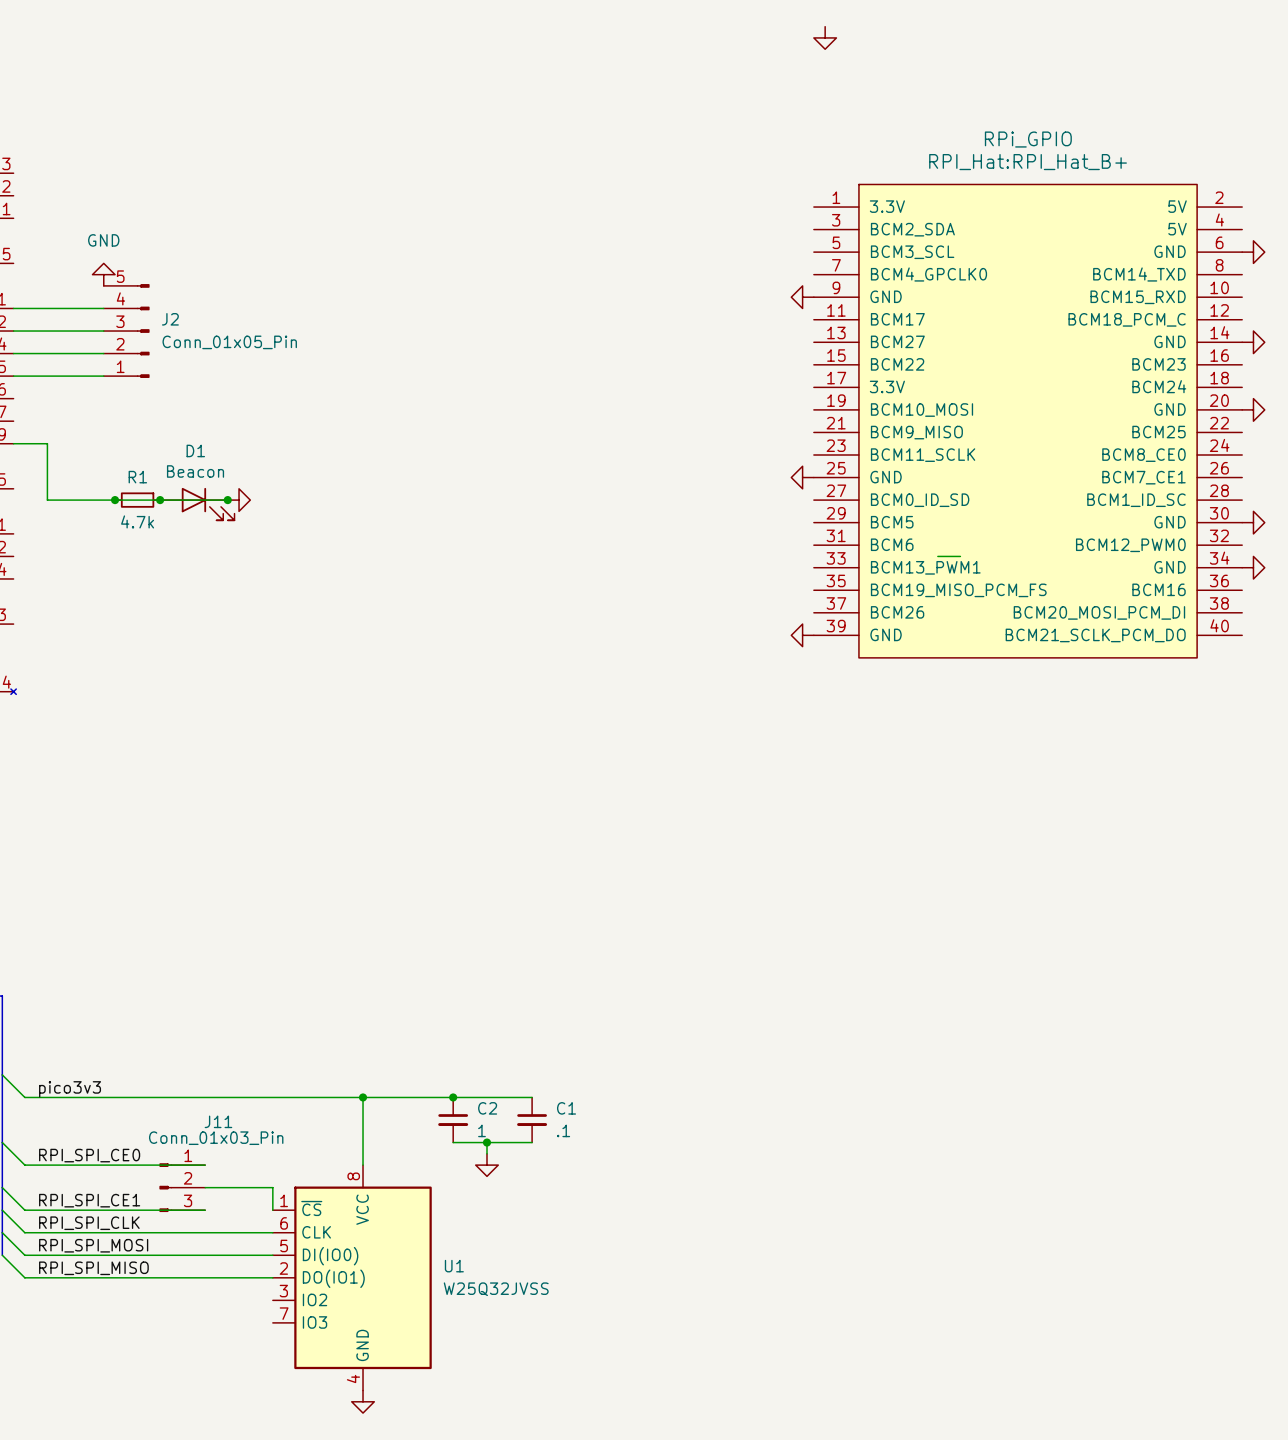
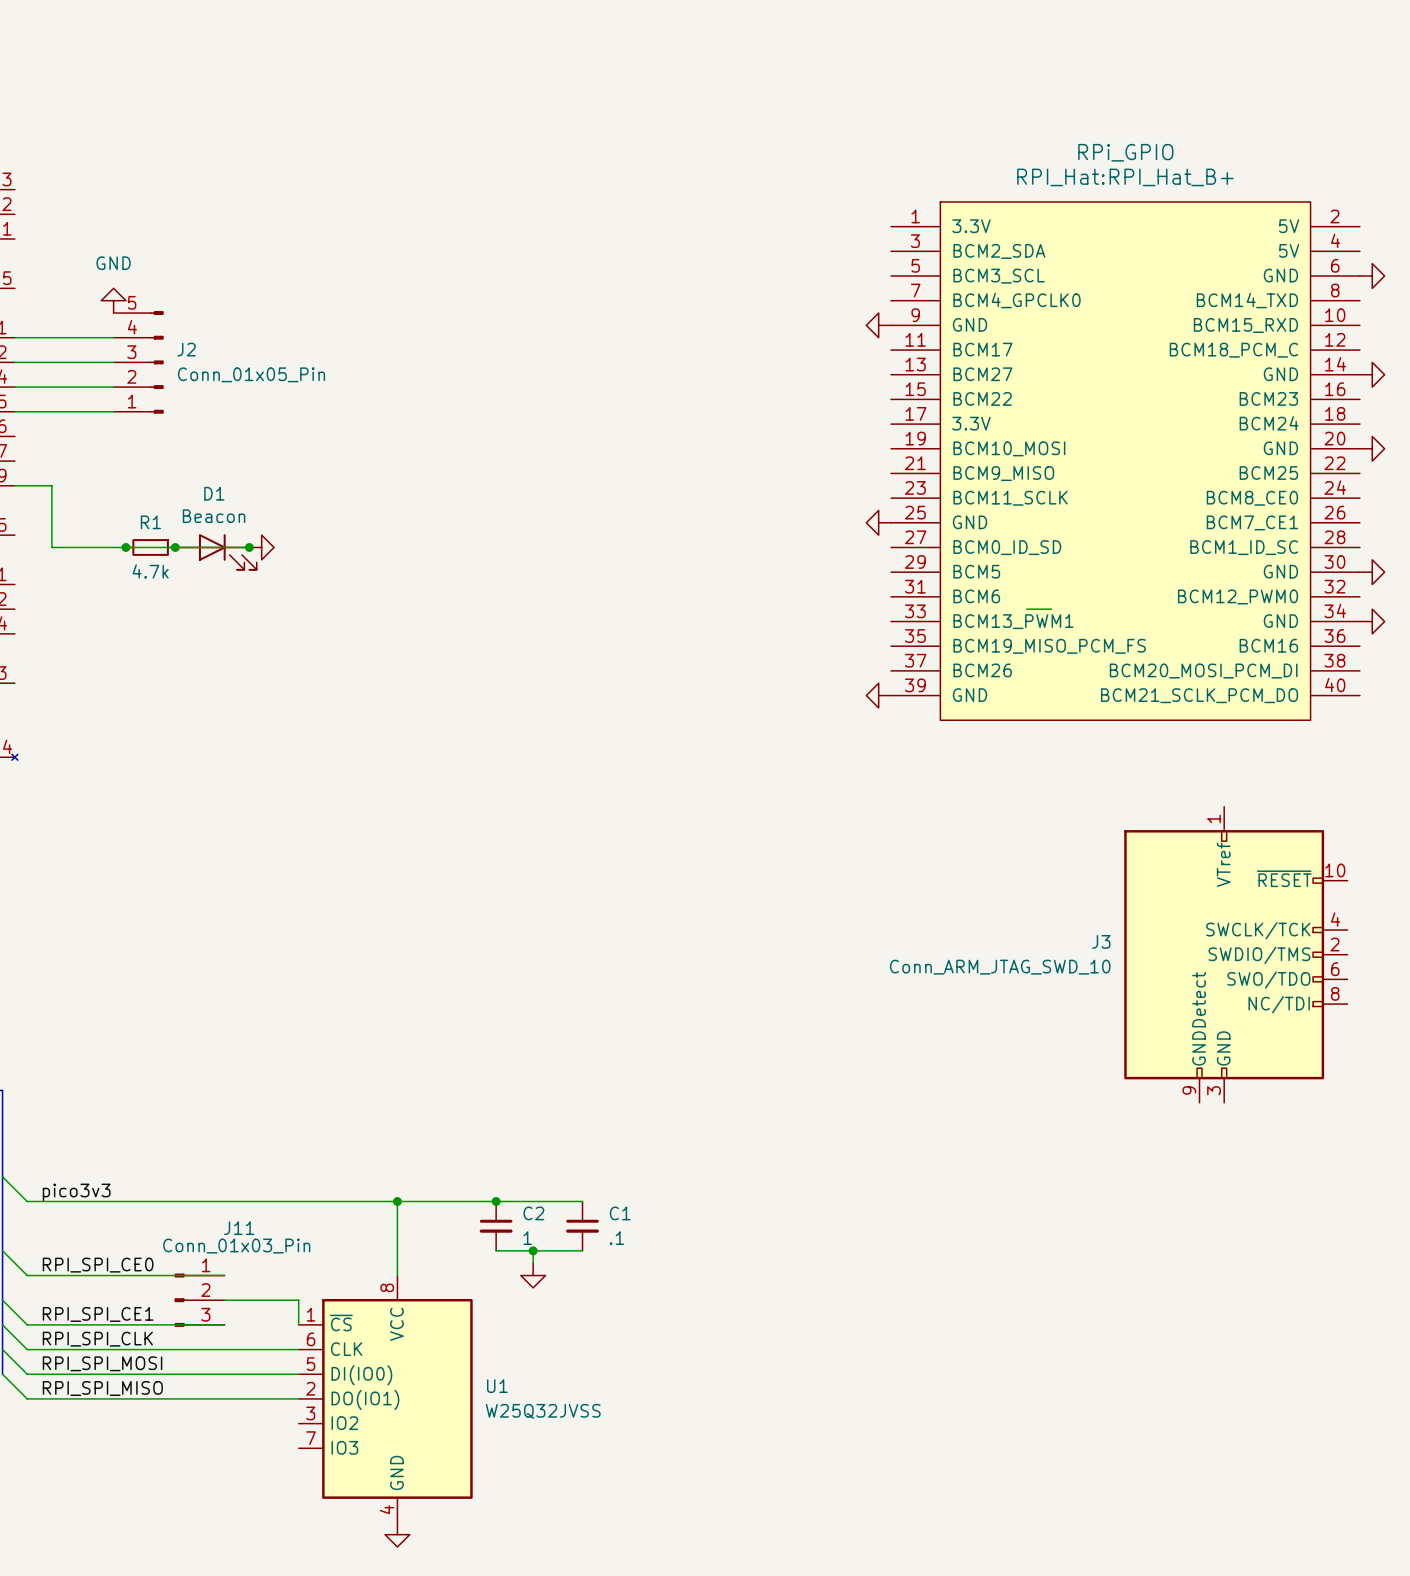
power symbol: (825, 37) -> none
J3: none -> Conn_ARM_JTAG_SWD_10 (1235, 954)

